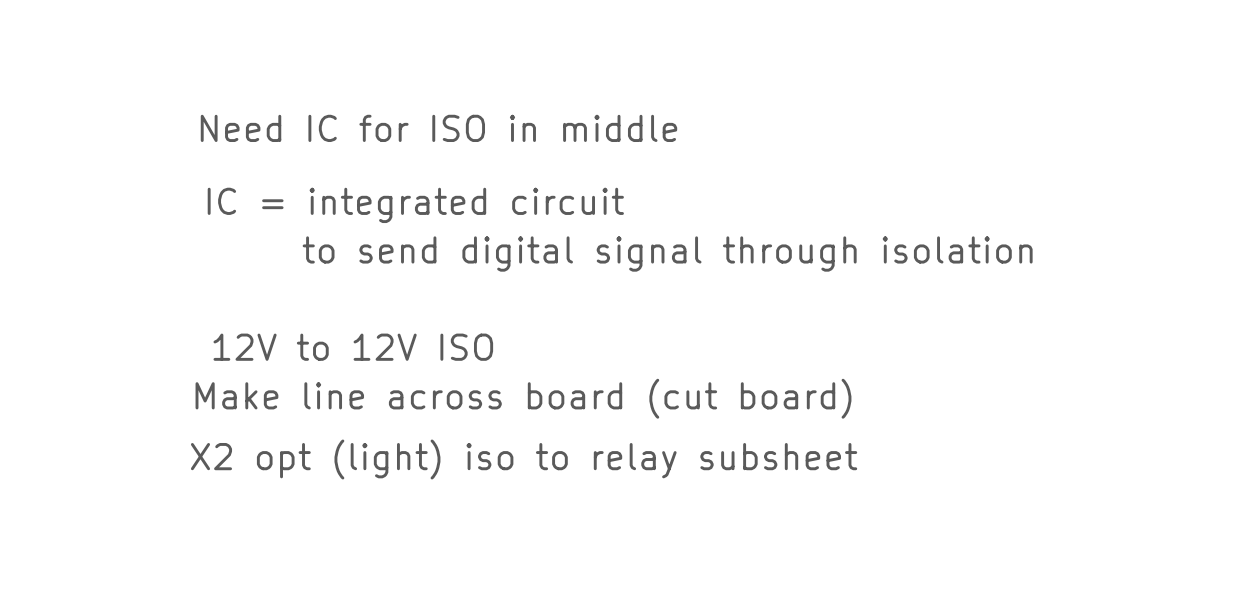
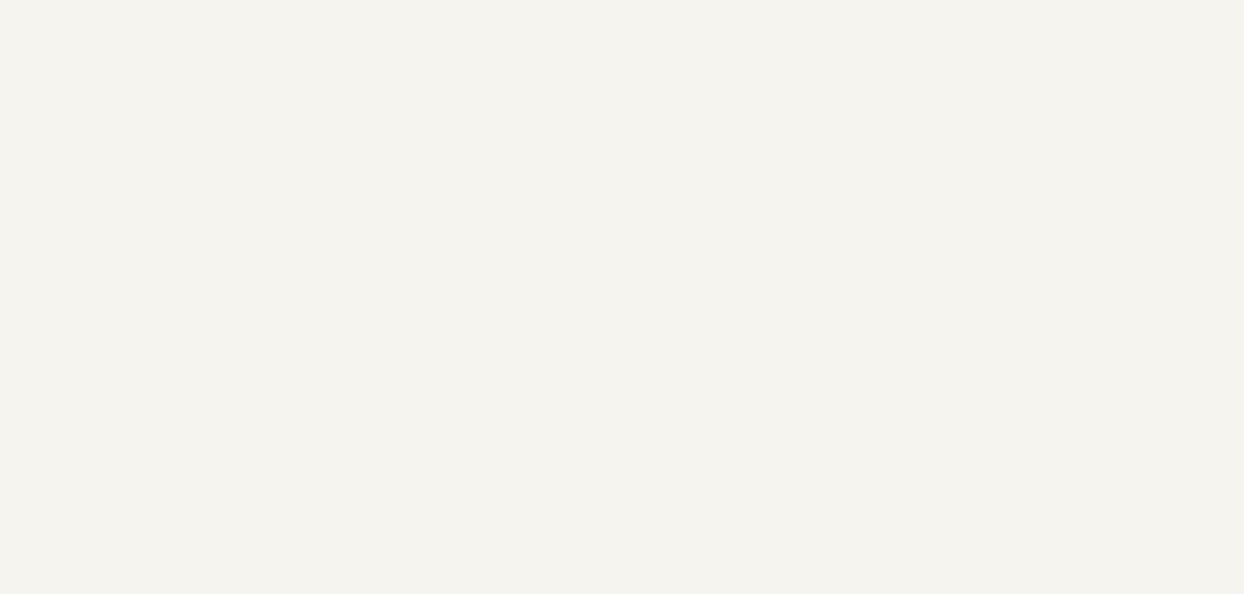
text: Need IC for ISO in middle (438, 128) -> none
text: IC = integrated circuit (415, 205) -> none
text: to send digital signal through isolation (667, 254) -> none
text: 12V to 12V ISO (353, 347) -> none
text: Make line across board (cut board) (523, 398) -> none
text: X2 opt (light) iso to relay subsheet (524, 459) -> none

